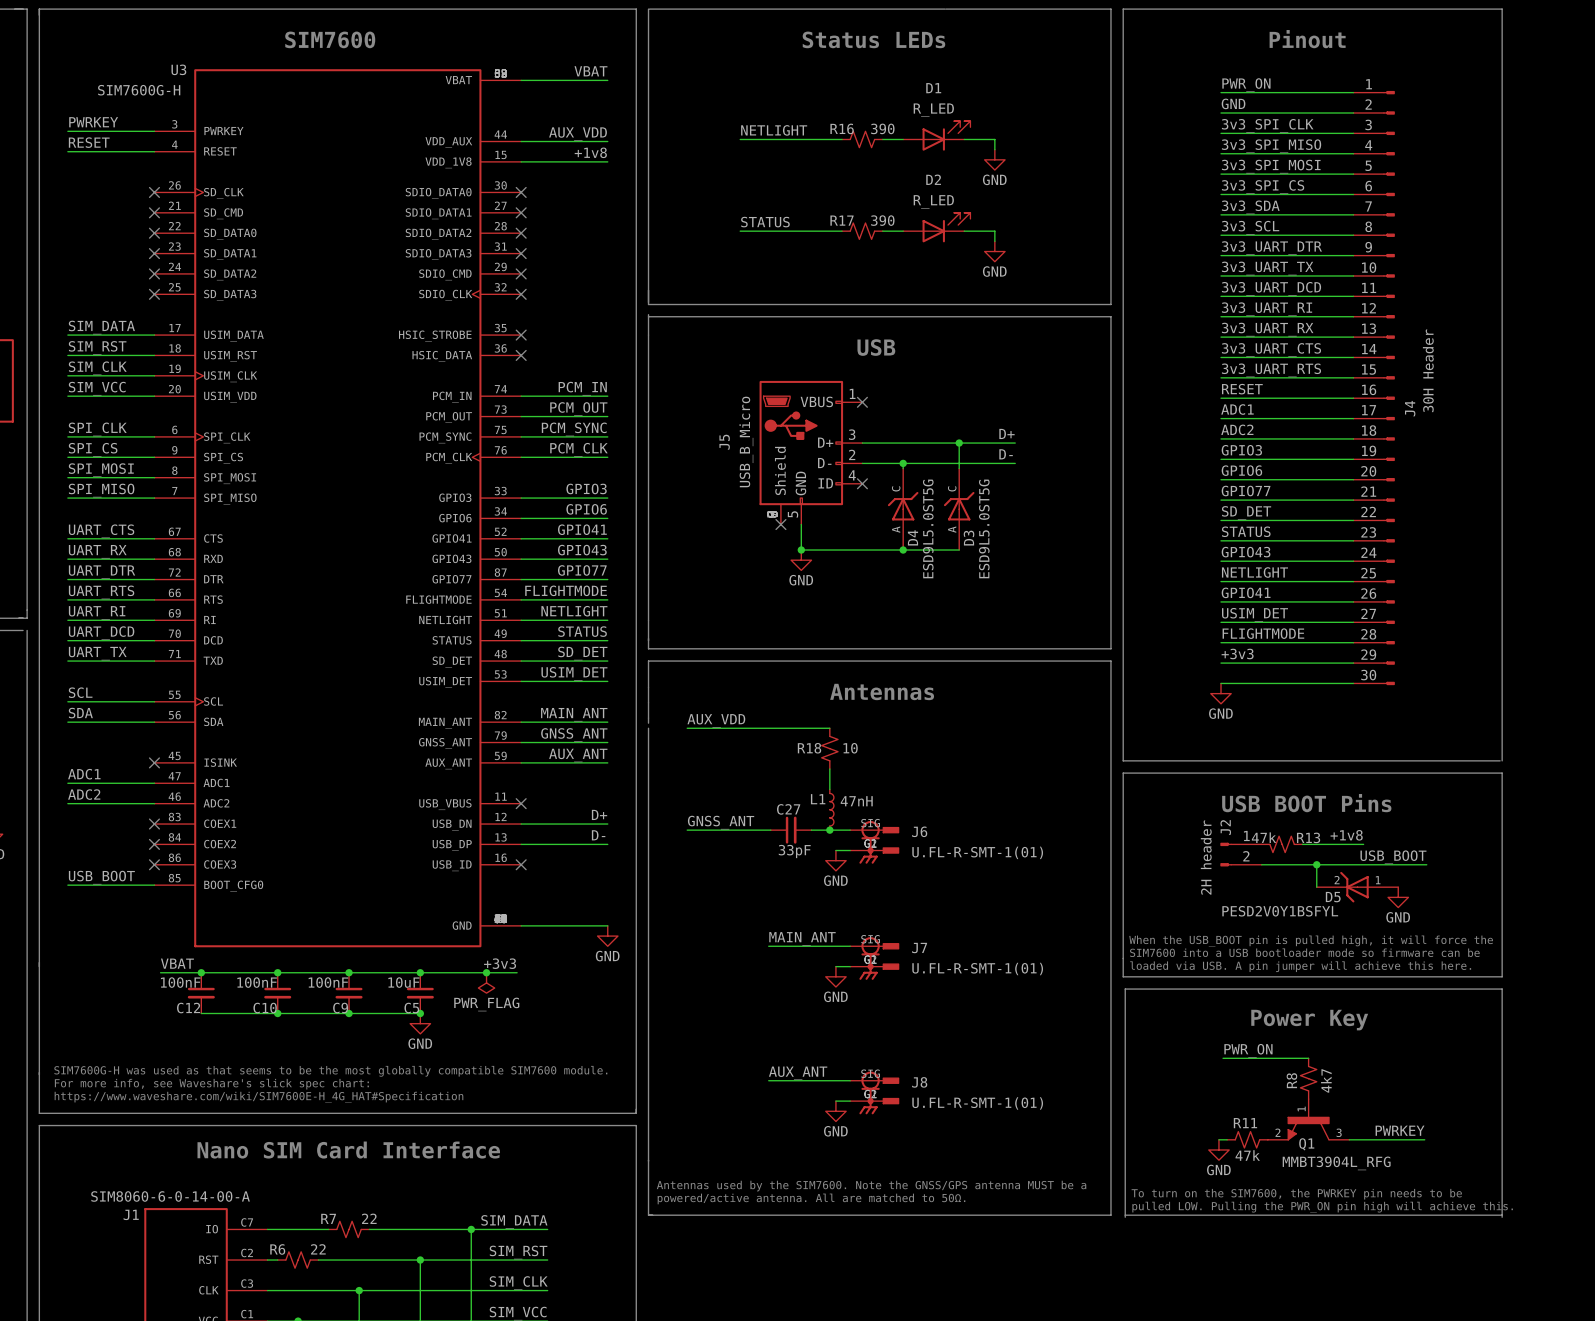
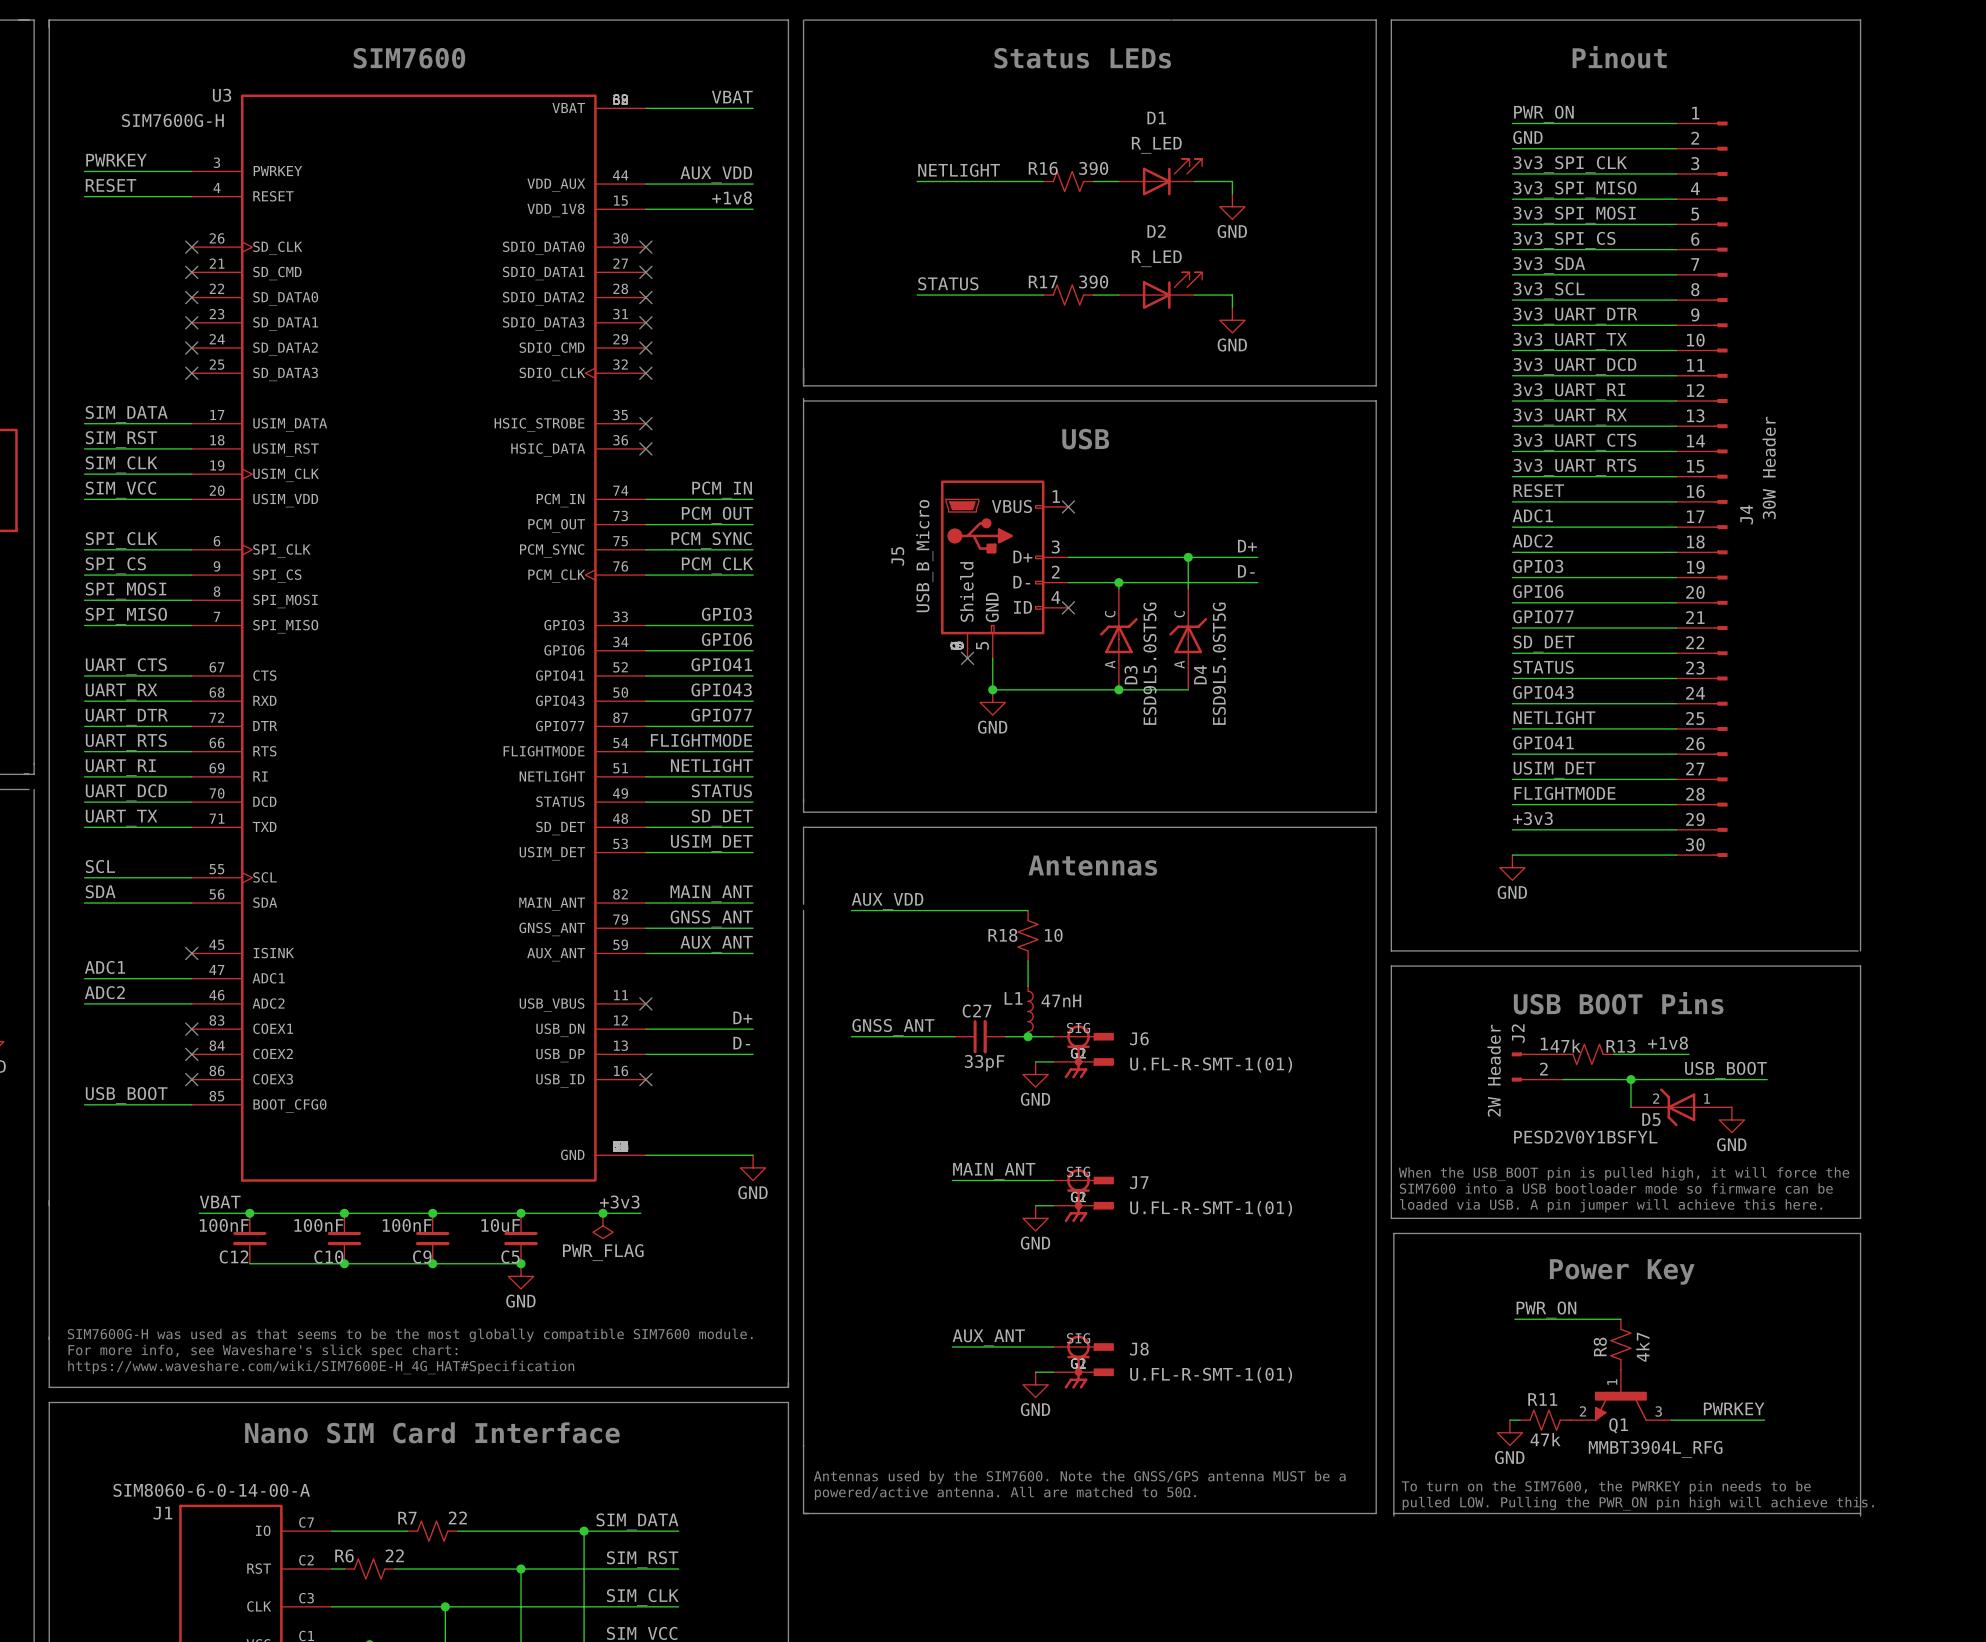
J4 value: 30H Header (1428, 370) -> 30W Header (1769, 467)
D4 name: D4 (912, 537) -> D3 (1131, 675)
D3 name: D3 (969, 538) -> D4 (1200, 674)
J2 value: 2H header (1206, 857) -> 2W Header (1494, 1070)

